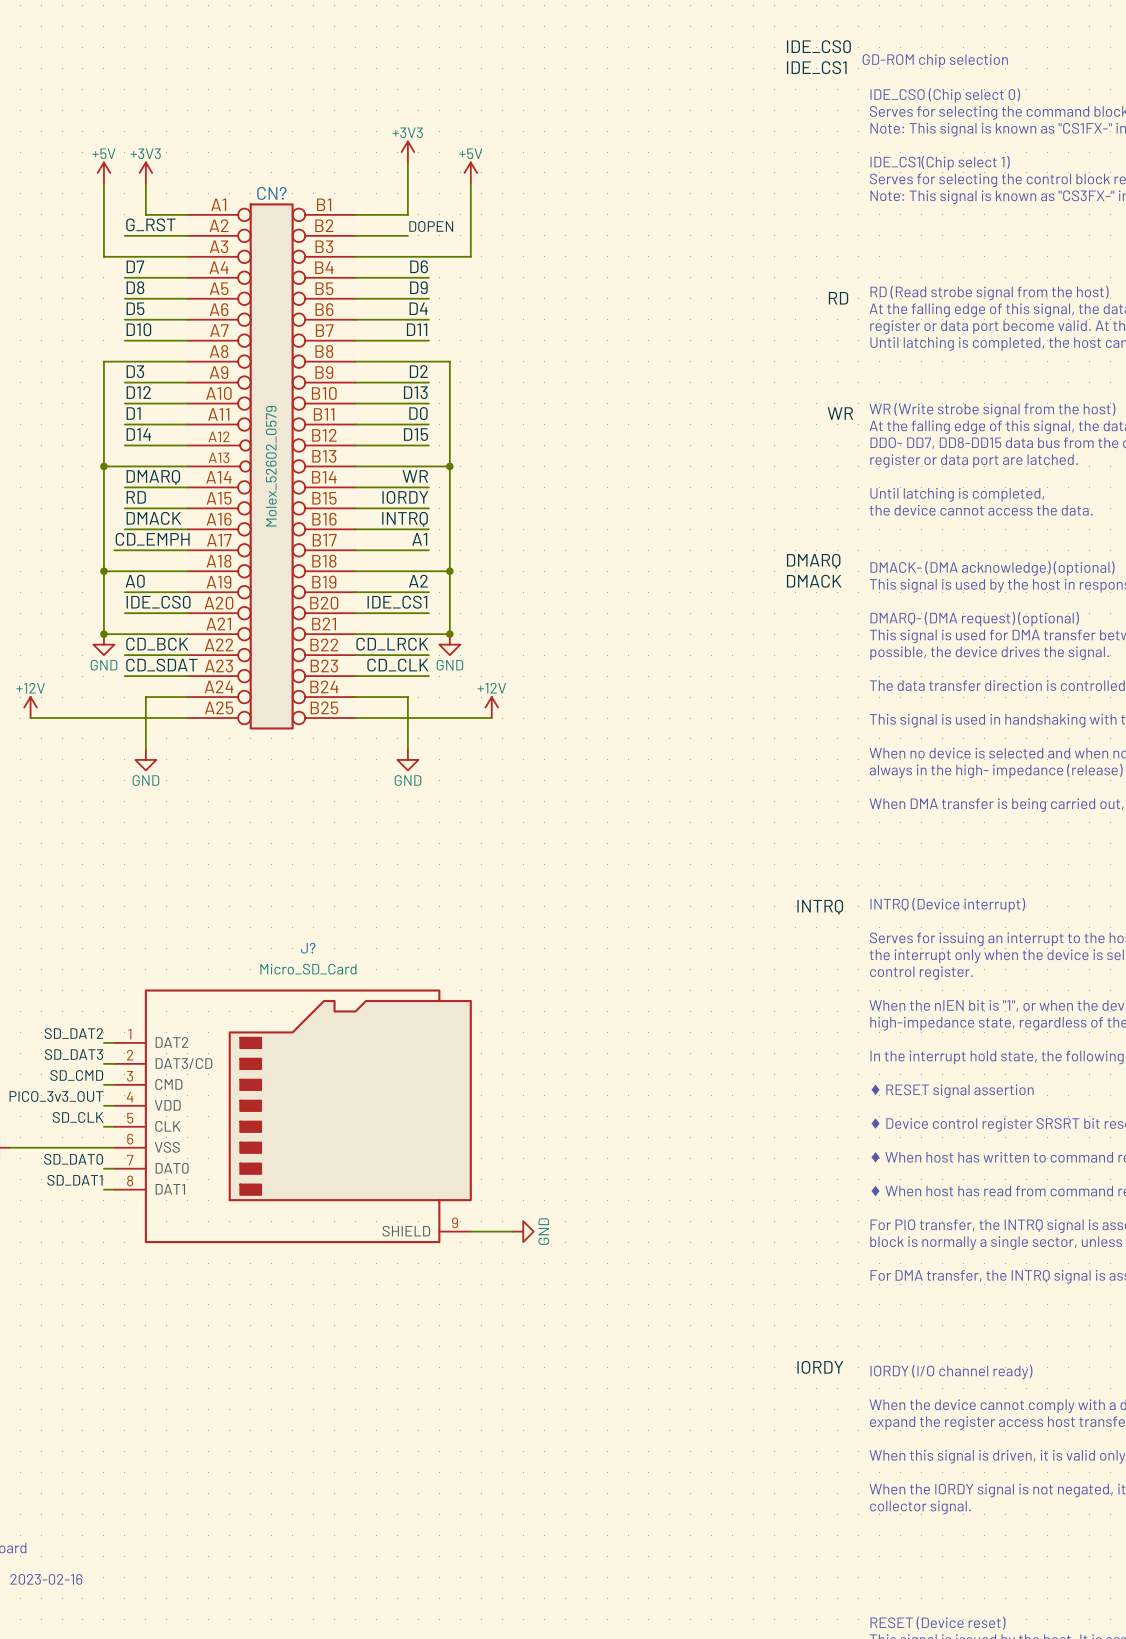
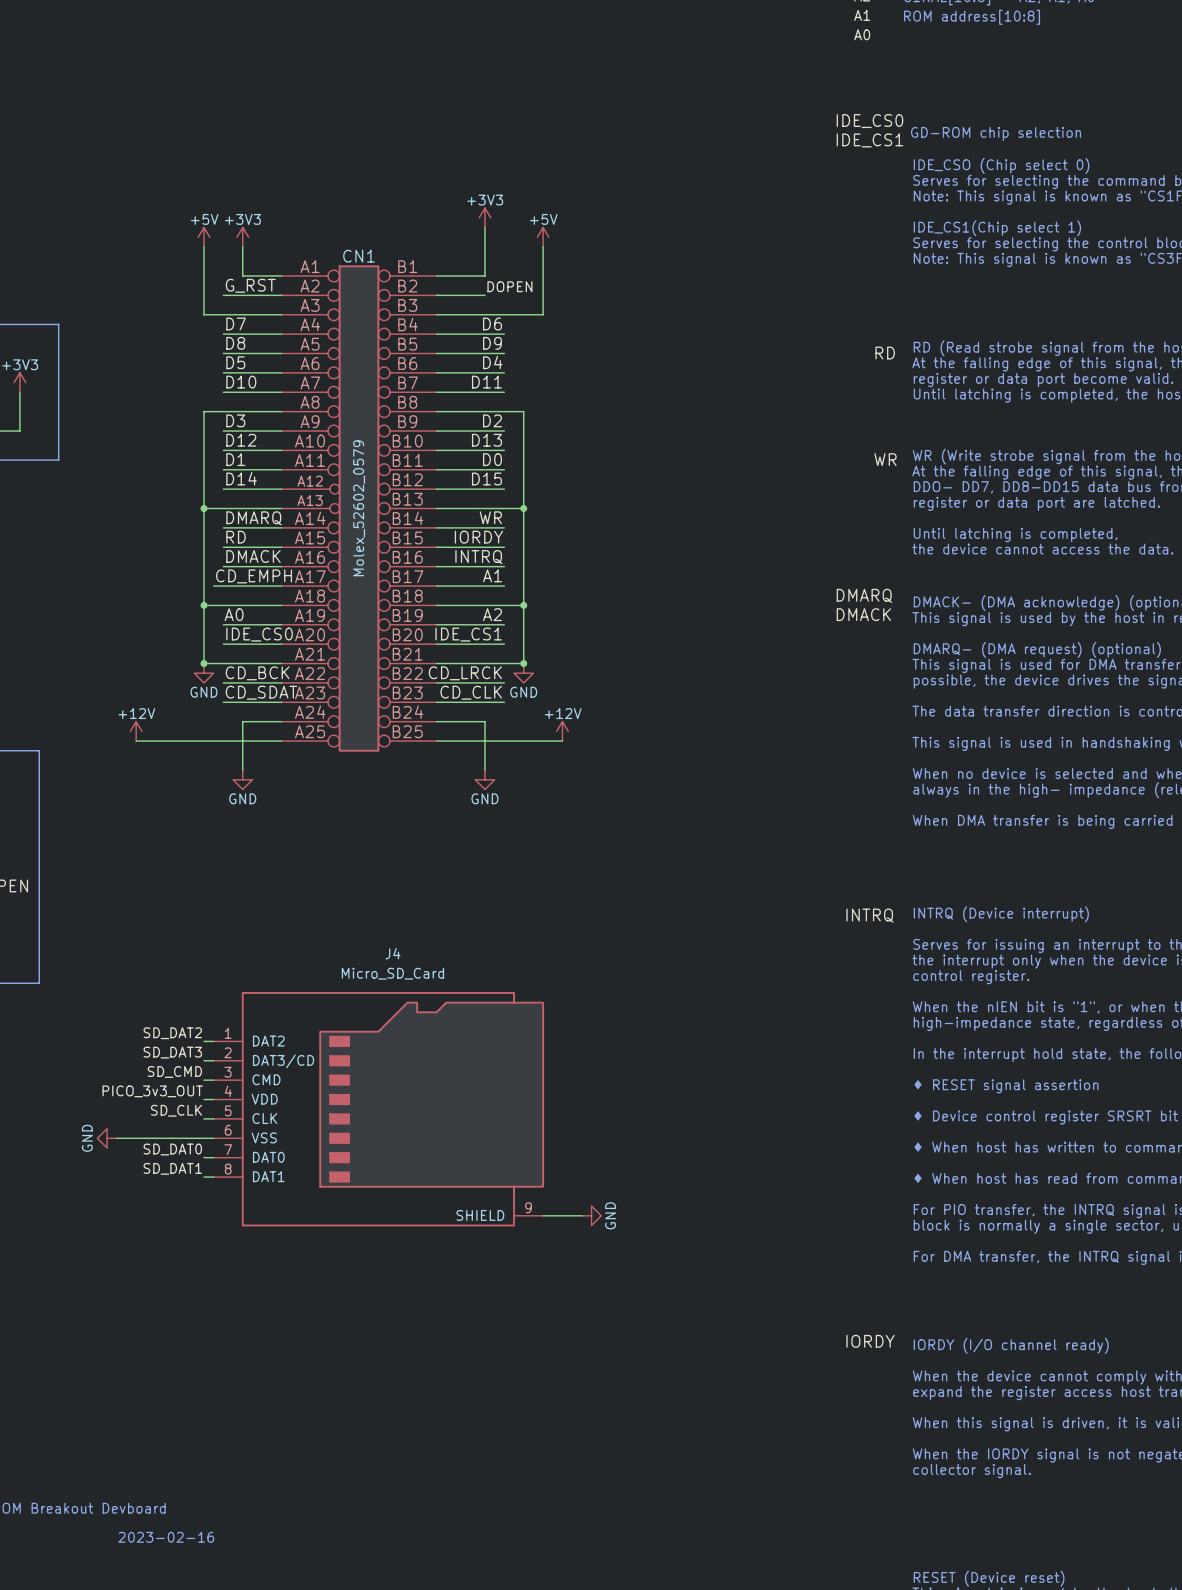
CN? name: CN? (271, 193) -> CN1 (359, 256)
J? name: J? (308, 948) -> J4 (392, 953)

